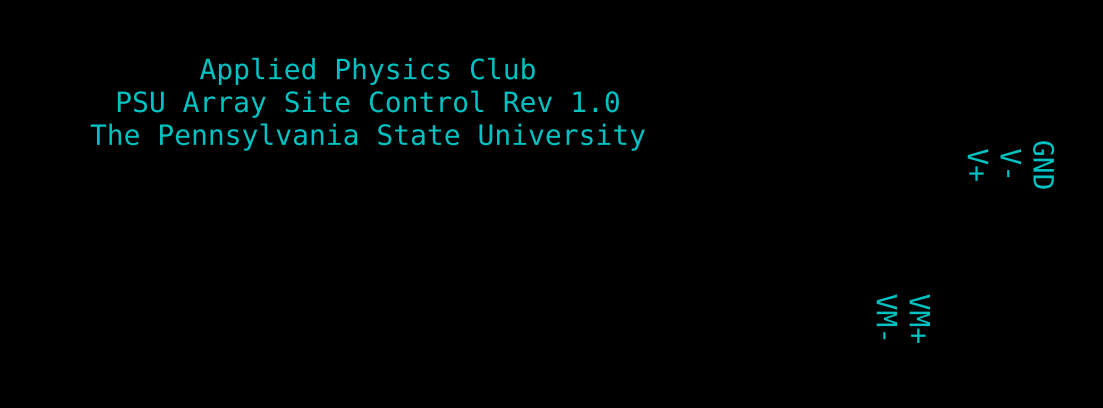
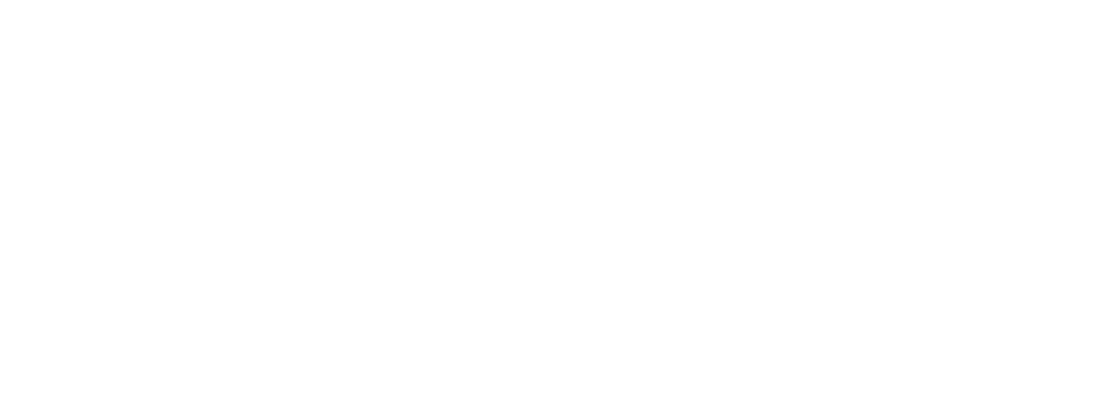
text: Applied Physics Club (367, 71) -> none
text: PSU Array Site Control Rev 1.0 (368, 104) -> none
text: The Pennsylvania State University (367, 137) -> none
text: V- (1010, 163) -> none
text: V+ (977, 164) -> none
text: GND (1043, 164) -> none
text: VM- (886, 316) -> none
text: VM+ (919, 318) -> none

